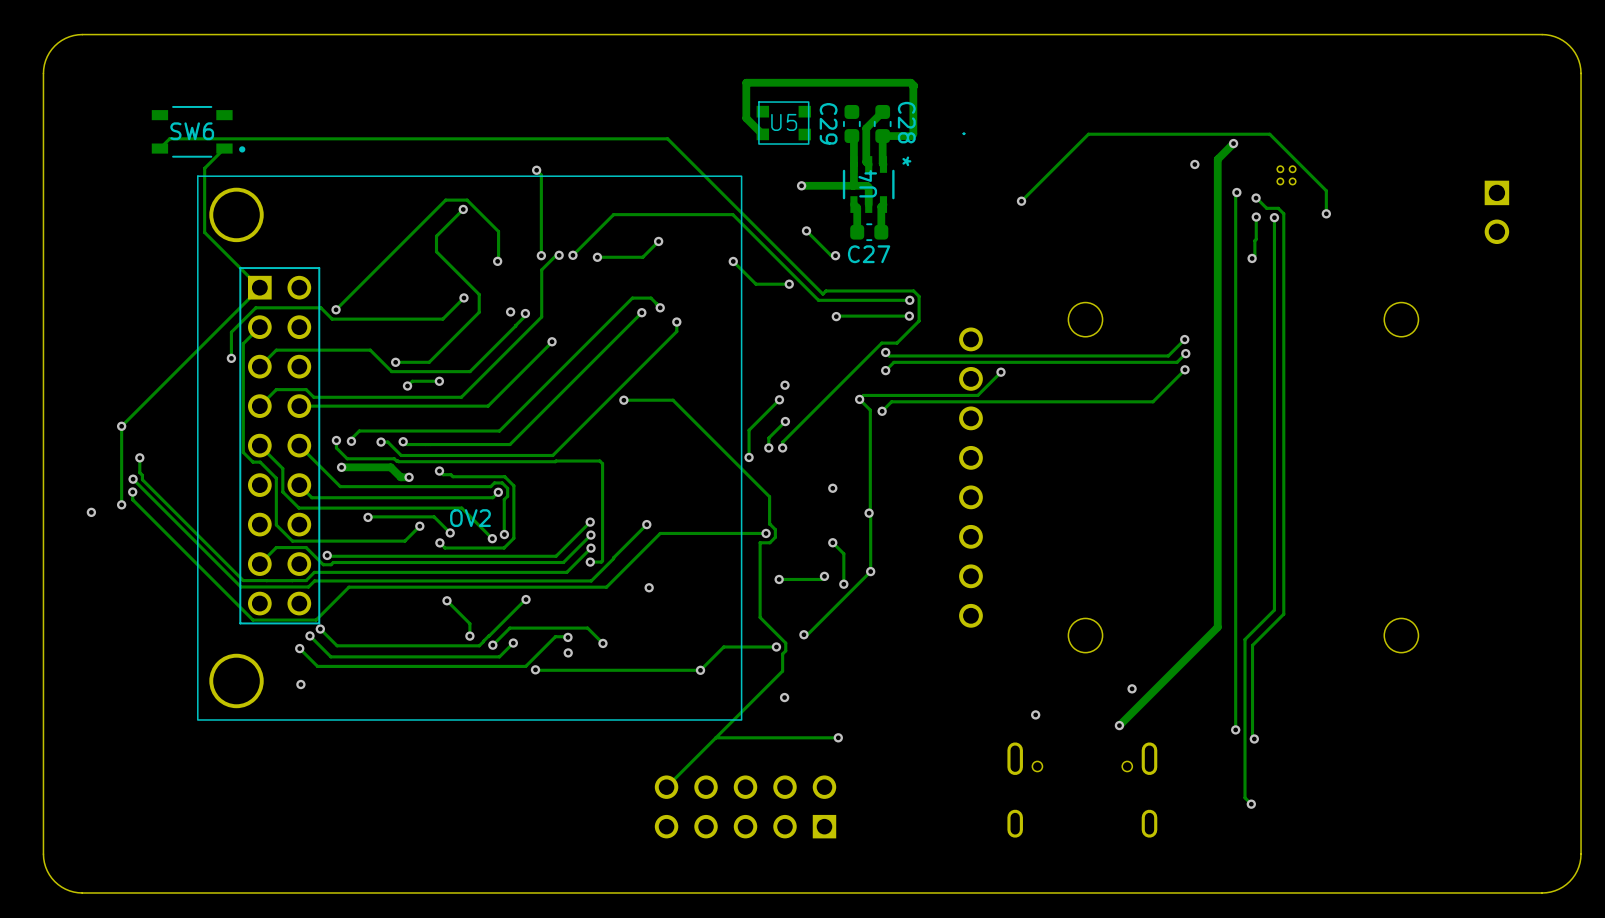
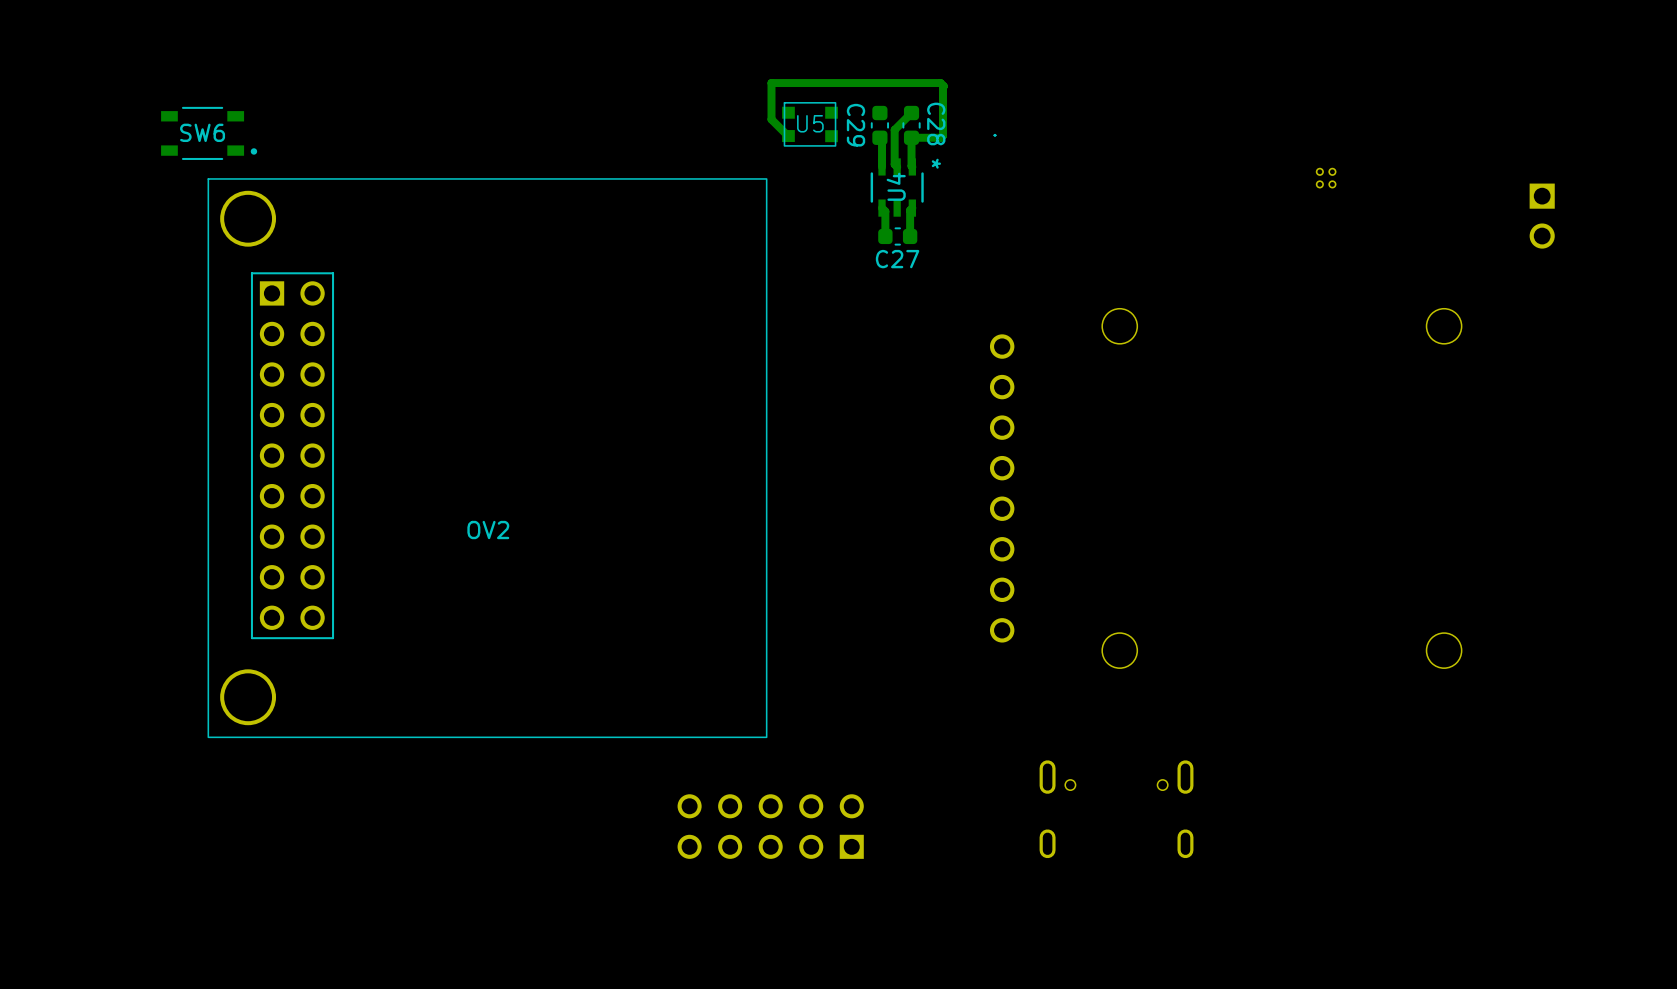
board edge: (1542, 34) (82, 34) (61, 40) (49, 52) (43, 73) (43, 854) (49, 874) (61, 887) (82, 892) (1542, 892) (1562, 887) (1577, 870) (1581, 854) (1581, 73) (1578, 60) (1569, 45) (1555, 36) (1542, 34) -> none
track: (1233, 143) (1217, 159) (1217, 627) (1119, 725) -> none
via: (1233, 143) -> none
track: (159, 148) (169, 138) (667, 138) (822, 294) (826, 290) (913, 290) (919, 296) (919, 320) (896, 343) (881, 343) (782, 442) (782, 447) -> none
track: (224, 148) (204, 168) (204, 232) (259, 288) (121, 426) (121, 504) -> none
track: (853, 164) (853, 185) -> none
via: (1194, 164) -> none
track: (536, 170) (541, 175) (541, 255) -> none
via: (536, 170) -> none
track: (801, 185) (867, 185) (868, 204) -> none
via: (801, 185) -> none
track: (1236, 192) (1235, 729) -> none
via: (1236, 192) -> none
track: (1256, 198) (1266, 208) (1278, 208) (1283, 213) (1283, 614) (1252, 645) (1252, 737) (1254, 739) -> none
via: (1256, 198) -> none
track: (1021, 201) (1088, 134) (1269, 134) (1326, 190) (1326, 213) -> none
via: (1021, 201) -> none
track: (463, 209) (436, 236) (436, 251) (479, 294) (479, 312) (429, 362) (395, 362) -> none
via: (463, 209) -> none
via: (1326, 213) -> none
track: (1256, 217) (1254, 255) (1252, 258) -> none
via: (1256, 217) -> none
track: (1274, 217) (1274, 610) (1245, 639) (1245, 797) (1251, 804) -> none
via: (1274, 217) -> none
track: (806, 230) (831, 255) (835, 255) -> none
via: (806, 230) -> none
track: (658, 241) (642, 257) (597, 257) -> none
via: (658, 241) -> none
via: (541, 255) -> none
track: (559, 255) (556, 255) (541, 269) (541, 316) (461, 397) (313, 397) (306, 389) (276, 389) (259, 406) -> none
via: (559, 255) -> none
track: (572, 255) (613, 214) (732, 214) (818, 300) (909, 300) -> none
via: (572, 255) -> none
via: (835, 255) -> none
via: (597, 257) -> none
via: (1252, 258) -> none
track: (497, 261) (498, 231) (467, 200) (445, 200) (336, 309) -> none
via: (497, 261) -> none
track: (733, 261) (756, 284) (789, 284) -> none
via: (733, 261) -> none
via: (789, 284) -> none
track: (463, 297) (442, 319) (332, 319) (320, 307) (255, 307) (231, 332) (231, 358) -> none
via: (463, 297) -> none
via: (909, 300) -> none
track: (660, 307) (650, 298) (632, 298) (499, 431) (359, 431) (351, 441) -> none
via: (660, 307) -> none
via: (336, 309) -> none
via: (510, 311) -> none
track: (641, 312) (509, 444) (405, 444) (403, 441) -> none
via: (641, 312) -> none
track: (525, 313) (515, 325) -> none
via: (525, 313) -> none
via: (836, 316) -> none
track: (909, 316) (836, 316) -> none
via: (909, 316) -> none
track: (676, 322) (676, 331) (552, 455) (401, 455) (387, 442) (381, 442) -> none
via: (676, 322) -> none
track: (515, 325) (470, 371) (391, 371) (370, 350) (276, 350) (259, 366) -> none
track: (259, 327) (243, 343) (243, 452) (253, 462) (260, 462) (276, 478) (276, 524) (292, 541) (404, 541) (419, 526) -> none
track: (1184, 339) (1168, 355) (889, 355) (885, 352) -> none
via: (1184, 339) -> none
track: (552, 341) (488, 406) (299, 406) -> none
via: (552, 341) -> none
via: (885, 352) -> none
track: (1185, 353) (1177, 362) (893, 362) (885, 370) -> none
via: (1185, 353) -> none
via: (231, 358) -> none
via: (395, 362) -> none
track: (1184, 369) (1152, 401) (891, 401) (882, 411) -> none
via: (1184, 369) -> none
via: (885, 370) -> none
track: (1000, 372) (977, 395) (863, 395) (859, 399) (870, 410) (870, 571) (807, 634) (803, 634) -> none
via: (1000, 372) -> none
track: (439, 381) (412, 381) (407, 386) -> none
via: (439, 381) -> none
via: (785, 385) -> none
via: (407, 386) -> none
track: (779, 399) (749, 430) (749, 457) -> none
via: (779, 399) -> none
via: (859, 399) -> none
track: (623, 400) (673, 400) (769, 496) (769, 524) -> none
via: (623, 400) -> none
via: (882, 411) -> none
track: (785, 421) (768, 438) (768, 447) -> none
via: (785, 421) -> none
via: (121, 426) -> none
track: (336, 440) (336, 447) (347, 458) (394, 458) (398, 461) (599, 461) (602, 463) (602, 560) (590, 562) -> none
via: (336, 440) -> none
via: (351, 441) -> none
via: (403, 441) -> none
via: (381, 442) -> none
track: (259, 445) (282, 468) (282, 491) (298, 508) (461, 508) (492, 538) -> none
track: (299, 445) (340, 486) (490, 486) (494, 482) (502, 482) (507, 488) (507, 496) (504, 499) (504, 532) (505, 534) (504, 534) -> none
via: (768, 447) -> none
via: (782, 447) -> none
track: (139, 457) (139, 472) (142, 475) (142, 479) (243, 580) (266, 580) -> none
via: (139, 457) -> none
via: (749, 457) -> none
track: (341, 467) (390, 467) (400, 477) (409, 477) -> none
via: (341, 467) -> none
track: (439, 471) (443, 474) (450, 474) (453, 476) (504, 476) (513, 485) (513, 538) (504, 548) (444, 548) (439, 542) -> none
via: (439, 471) -> none
via: (409, 477) -> none
track: (133, 479) (240, 586) (308, 586) (314, 580) (591, 580) (646, 524) -> none
via: (133, 479) -> none
track: (299, 485) (311, 497) (492, 497) (498, 492) -> none
via: (832, 488) -> none
track: (132, 492) (132, 499) (253, 620) (316, 620) (349, 587) (606, 587) (660, 533) (766, 533) -> none
via: (132, 492) -> none
via: (498, 492) -> none
via: (121, 504) -> none
via: (91, 512) -> none
via: (869, 513) -> none
track: (368, 517) (434, 516) (450, 532) -> none
via: (368, 517) -> none
track: (590, 522) (556, 556) (328, 556) (327, 555) -> none
via: (590, 522) -> none
via: (646, 524) -> none
track: (769, 524) (775, 529) (775, 537) (769, 542) (760, 542) (760, 617) (785, 643) (785, 650) (782, 653) (782, 671) (666, 787) -> none
via: (419, 526) -> none
via: (450, 532) -> none
via: (766, 533) -> none
via: (504, 534) -> none
track: (590, 535) (563, 562) (333, 562) (331, 564) (323, 564) (306, 547) (276, 547) (259, 564) -> none
via: (590, 535) -> none
via: (492, 538) -> none
via: (439, 542) -> none
track: (832, 542) (843, 553) (843, 584) -> none
via: (832, 542) -> none
track: (591, 548) (566, 572) (314, 572) (306, 580) (292, 580) -> none
via: (591, 548) -> none
via: (327, 555) -> none
via: (590, 562) -> none
via: (870, 571) -> none
track: (824, 576) (821, 579) (779, 579) -> none
via: (824, 576) -> none
via: (779, 579) -> none
track: (292, 580) (266, 580) -> none
via: (843, 584) -> none
via: (649, 587) -> none
track: (526, 599) (479, 645) (337, 645) (320, 629) -> none
via: (526, 599) -> none
track: (447, 600) (469, 623) (469, 636) -> none
via: (447, 600) -> none
via: (320, 629) -> none
via: (803, 634) -> none
track: (309, 635) (330, 656) (499, 656) (513, 643) -> none
via: (309, 635) -> none
via: (469, 636) -> none
track: (567, 637) (555, 636) (525, 666) (317, 666) (299, 648) -> none
via: (567, 637) -> none
via: (513, 643) -> none
track: (602, 643) (587, 628) (509, 628) (492, 645) -> none
via: (602, 643) -> none
via: (492, 645) -> none
track: (776, 647) (723, 647) (700, 670) (535, 669) -> none
via: (776, 647) -> none
via: (299, 648) -> none
via: (568, 652) -> none
via: (535, 669) -> none
via: (700, 670) -> none
via: (300, 684) -> none
via: (1132, 688) -> none
via: (784, 697) -> none
via: (1035, 714) -> none
via: (1119, 725) -> none
via: (1235, 729) -> none
track: (838, 737) (715, 737) -> none
via: (838, 737) -> none
via: (1254, 739) -> none
via: (1251, 804) -> none

